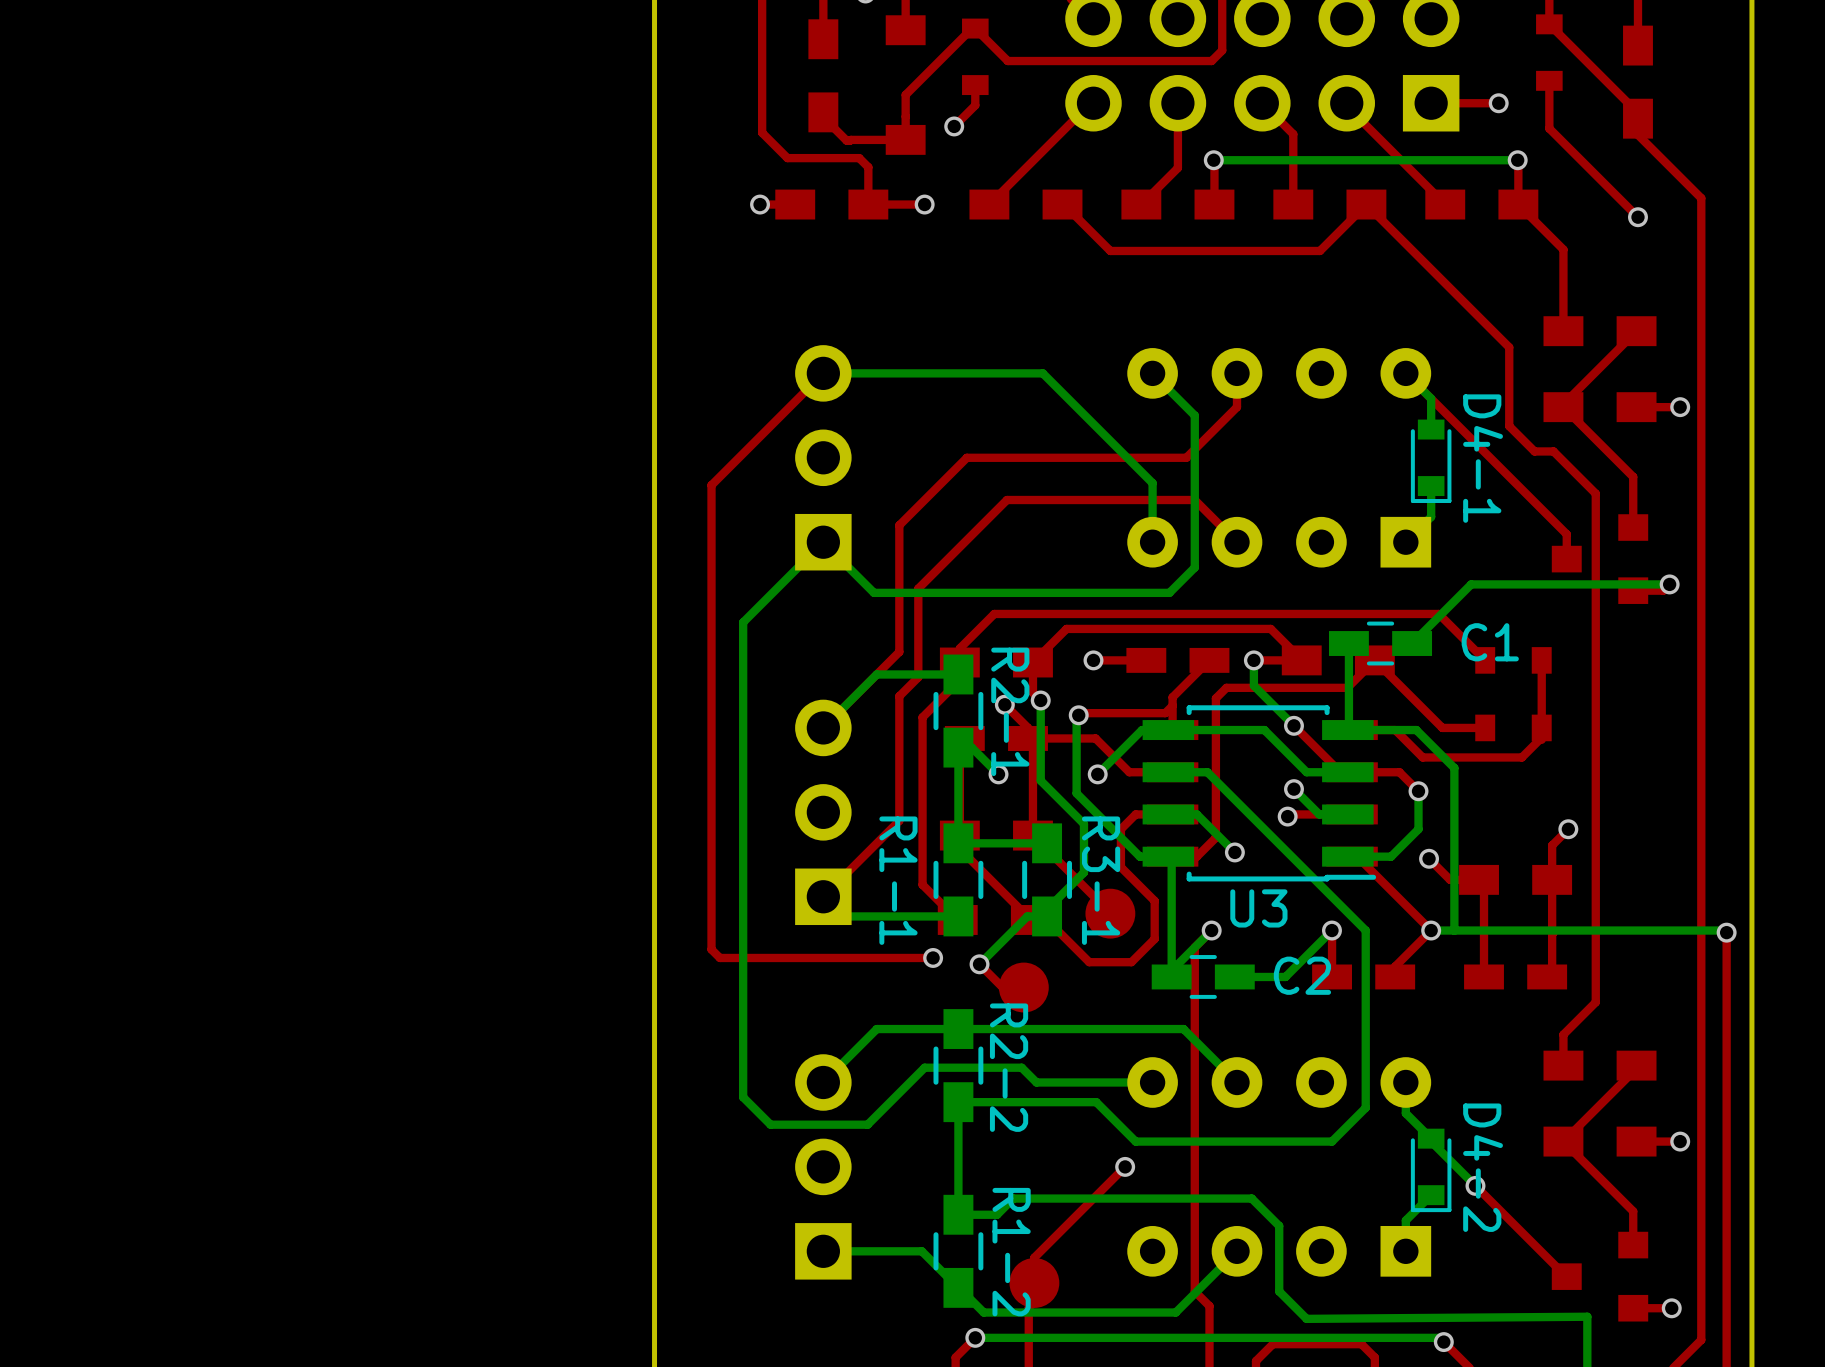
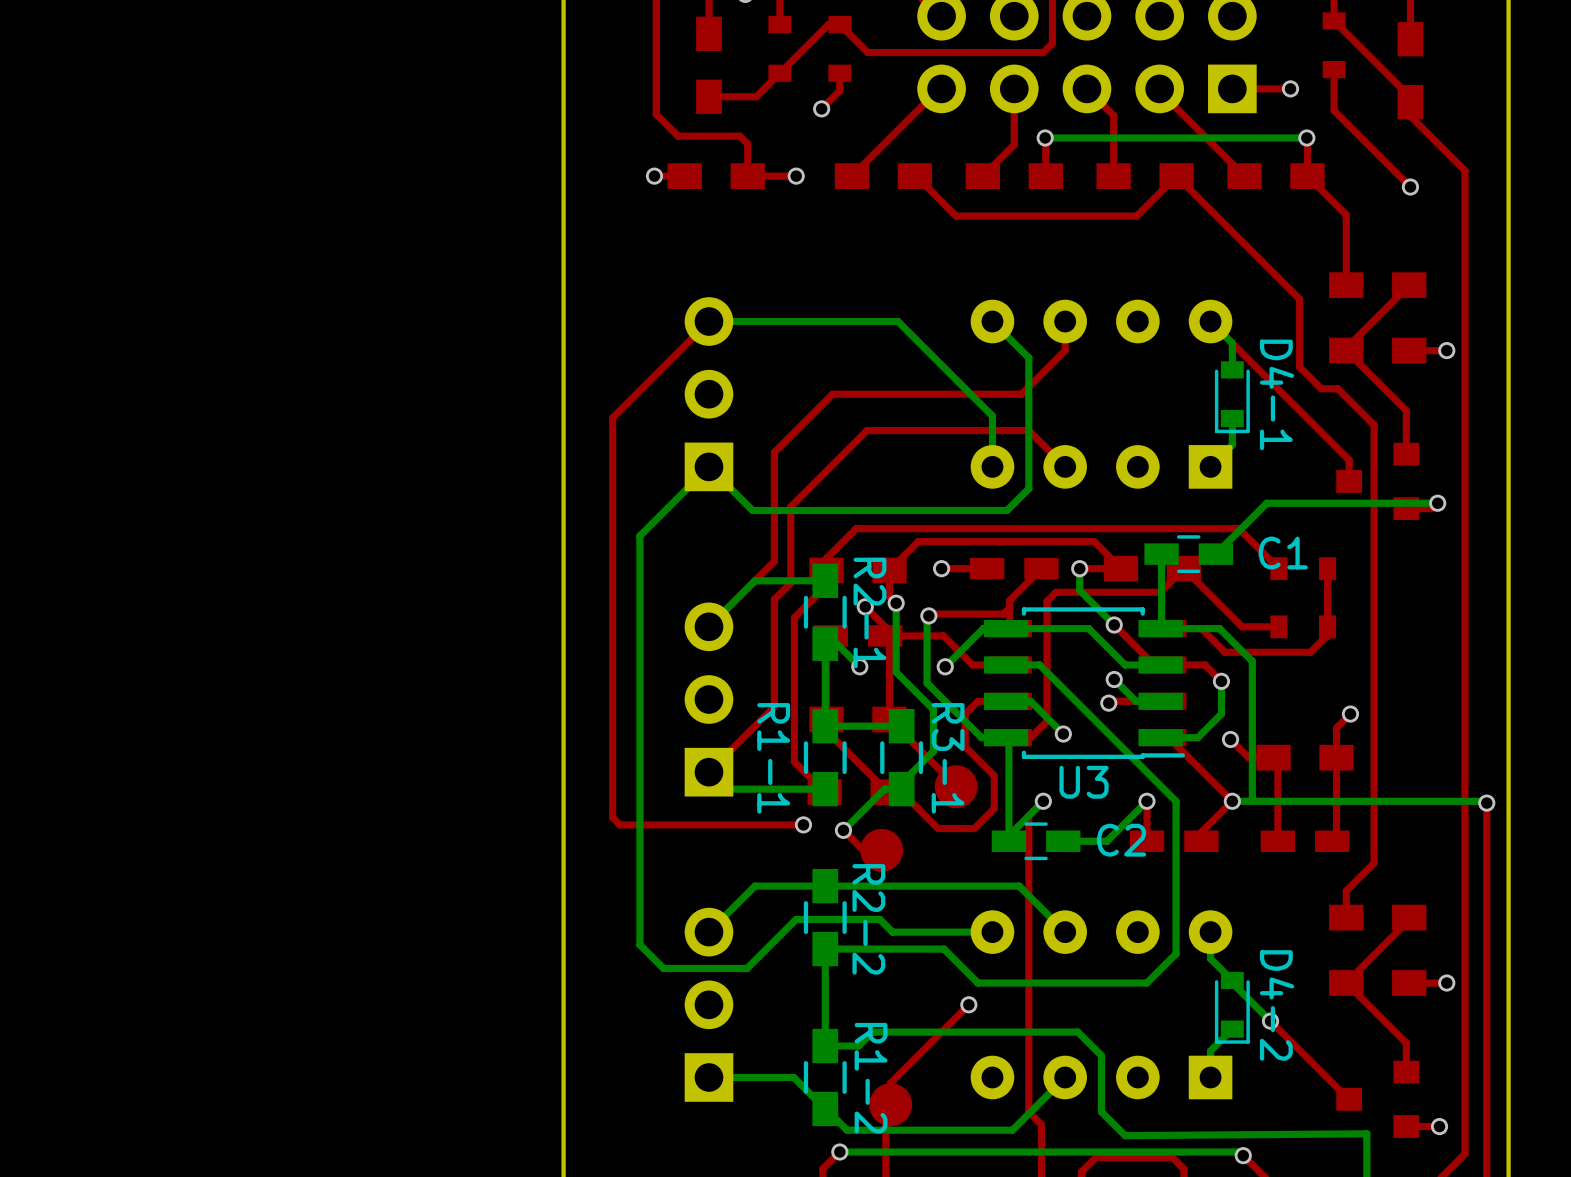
part footprint: [885, 15, 926, 155] -> [768, 16, 792, 82]
top track: (971, 28) (905, 94) (905, 139) (846, 140) (823, 117) (823, 112) -> (836, 24) (828, 24) (756, 96) (708, 96)

